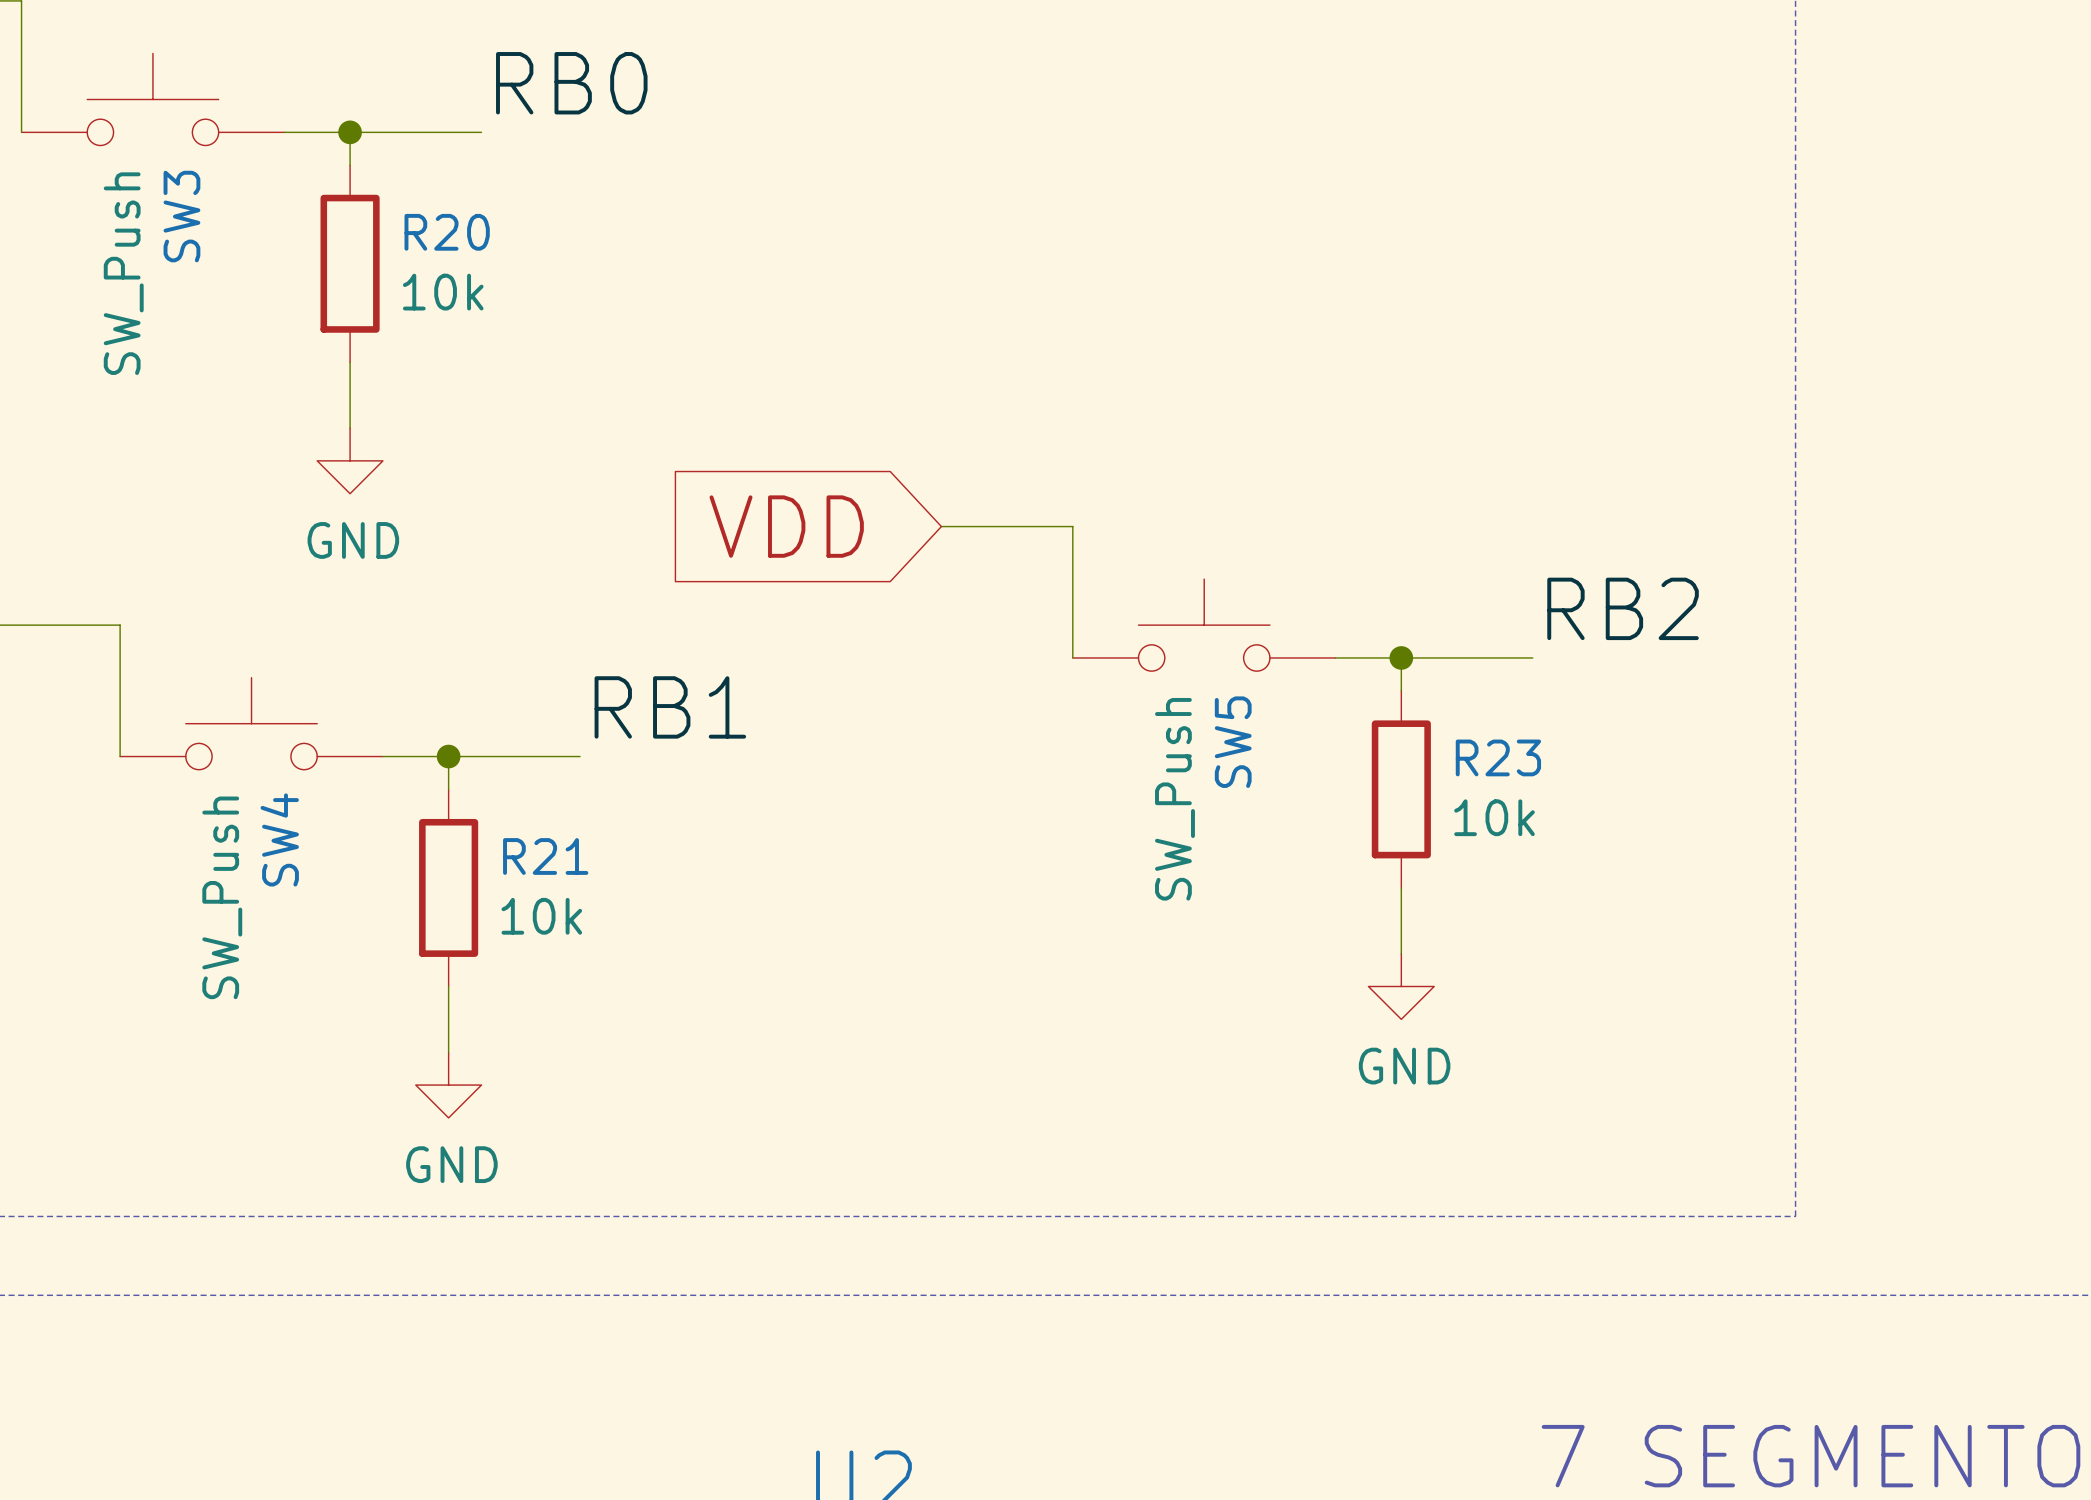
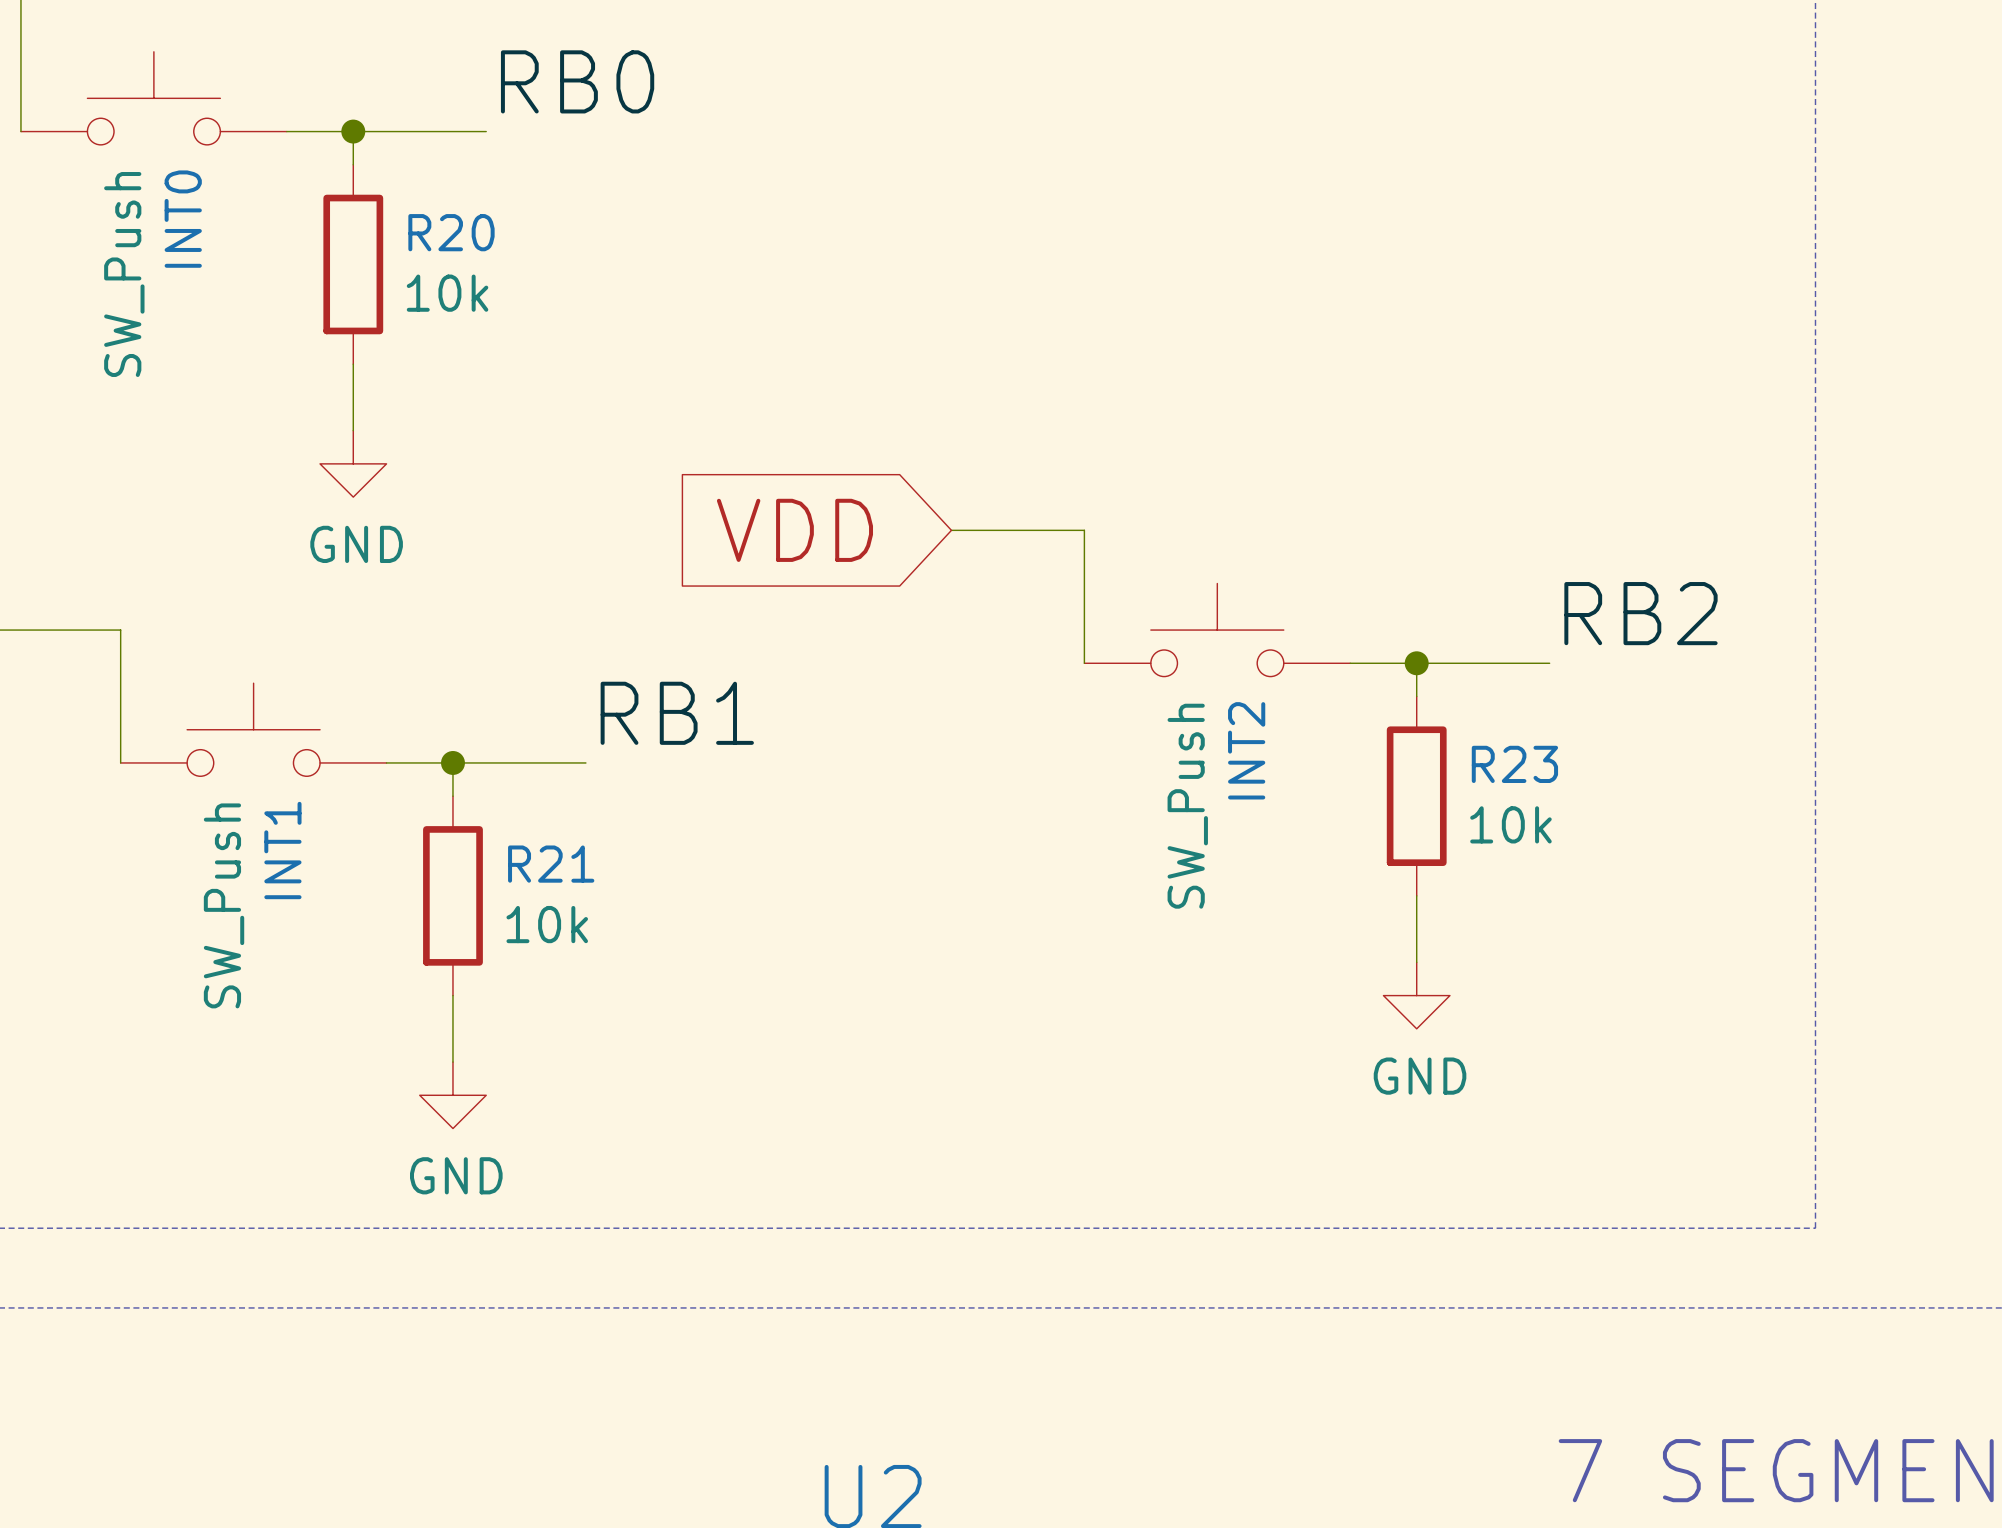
SW3 name: SW3 (181, 216) -> INT0 (183, 219)
SW5 name: SW5 (1233, 742) -> INT2 (1246, 750)
SW4 name: SW4 (279, 839) -> INT1 (282, 850)

